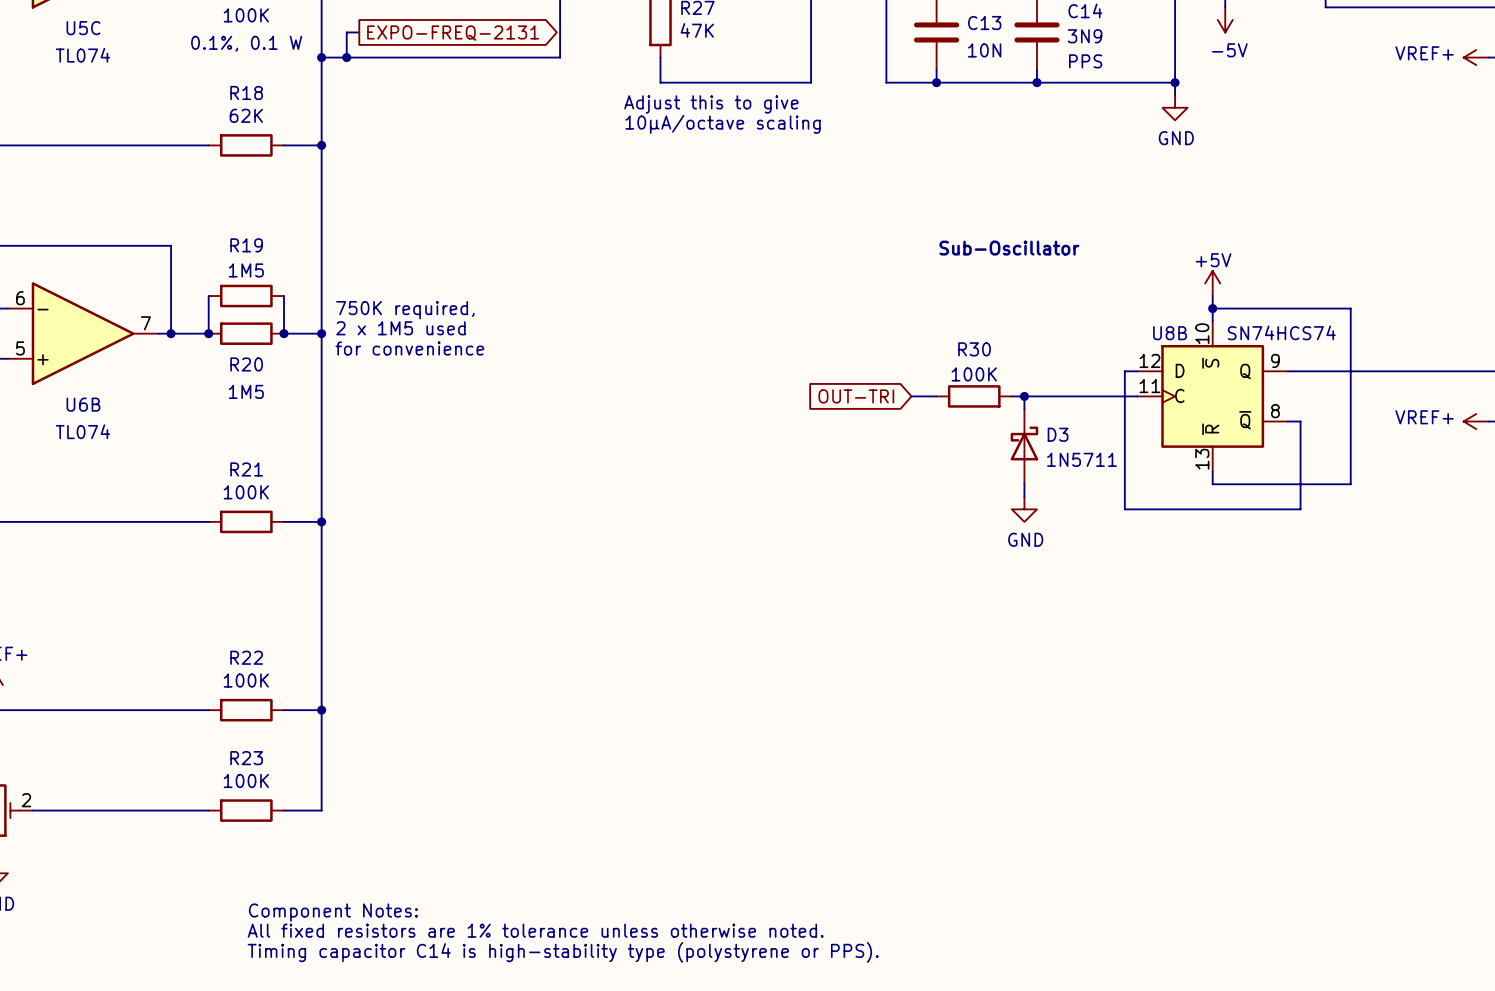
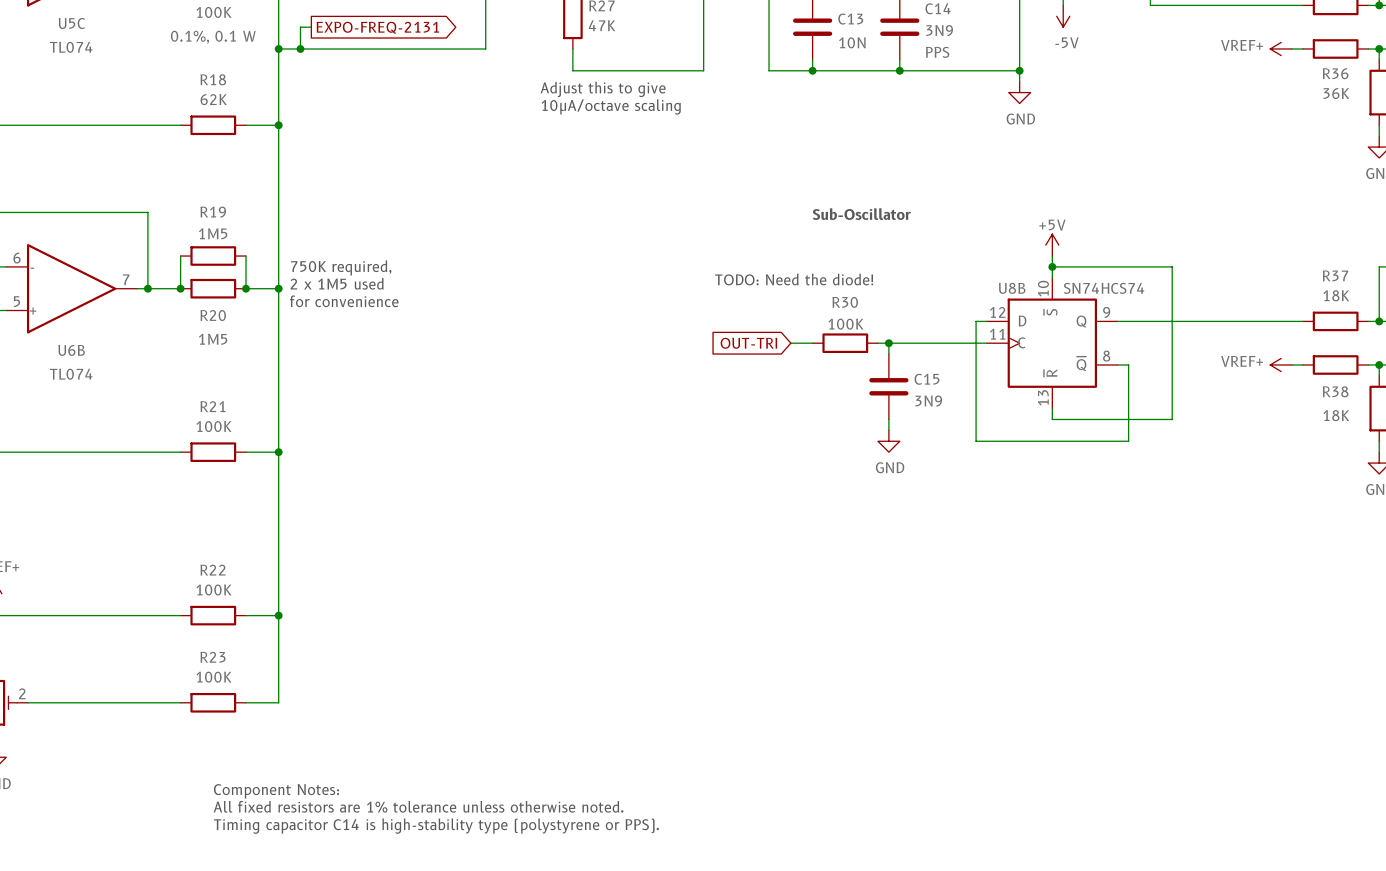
text: none -> TODO: Need the diode! (794, 279)
D3: 1N5711 (1024, 446) -> none
C15: none -> 3N9 (888, 386)

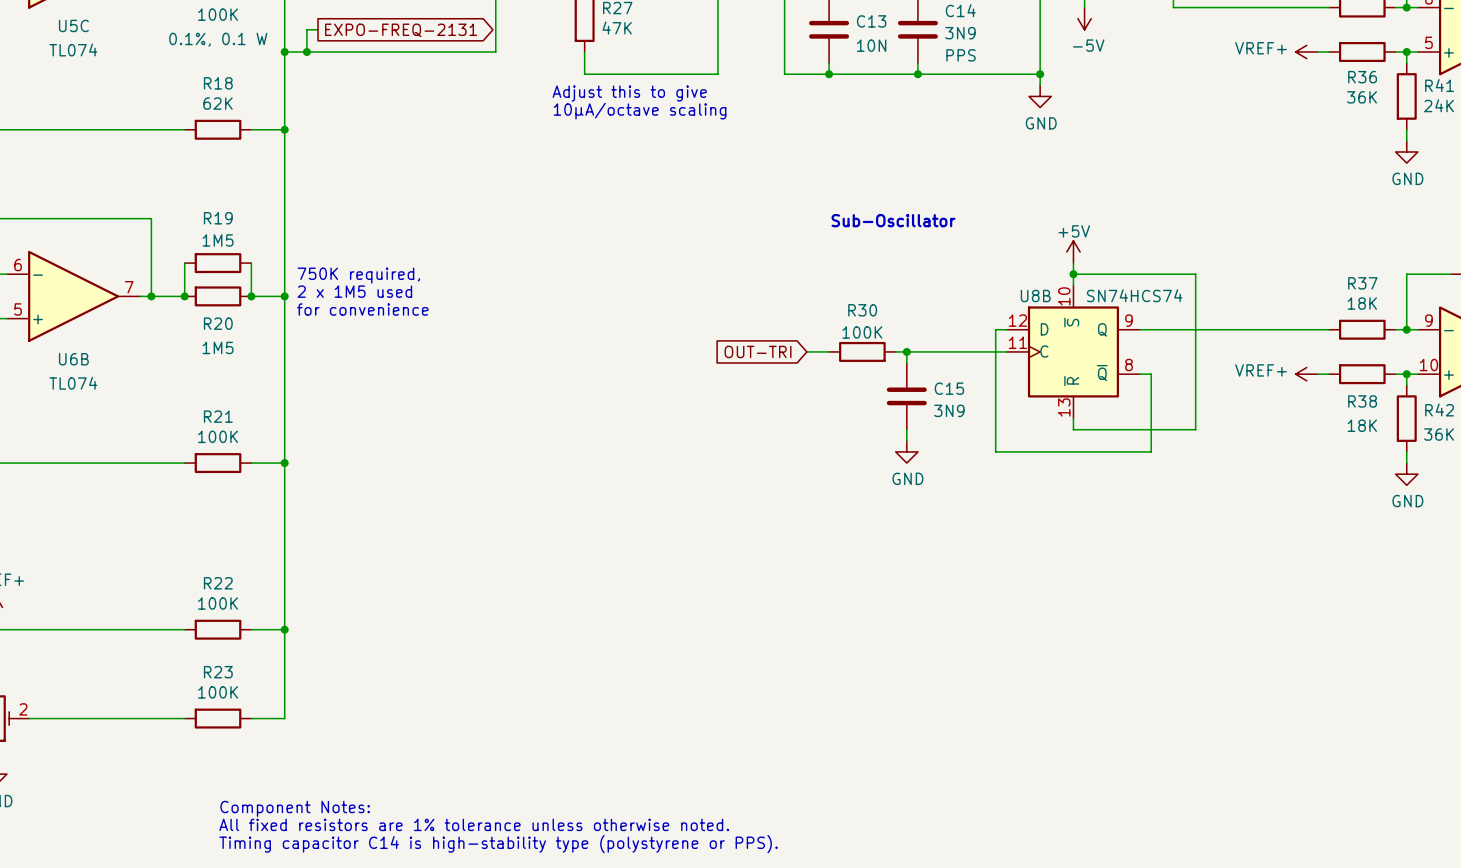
text: TODO: Need the diode! (794, 279) -> none

